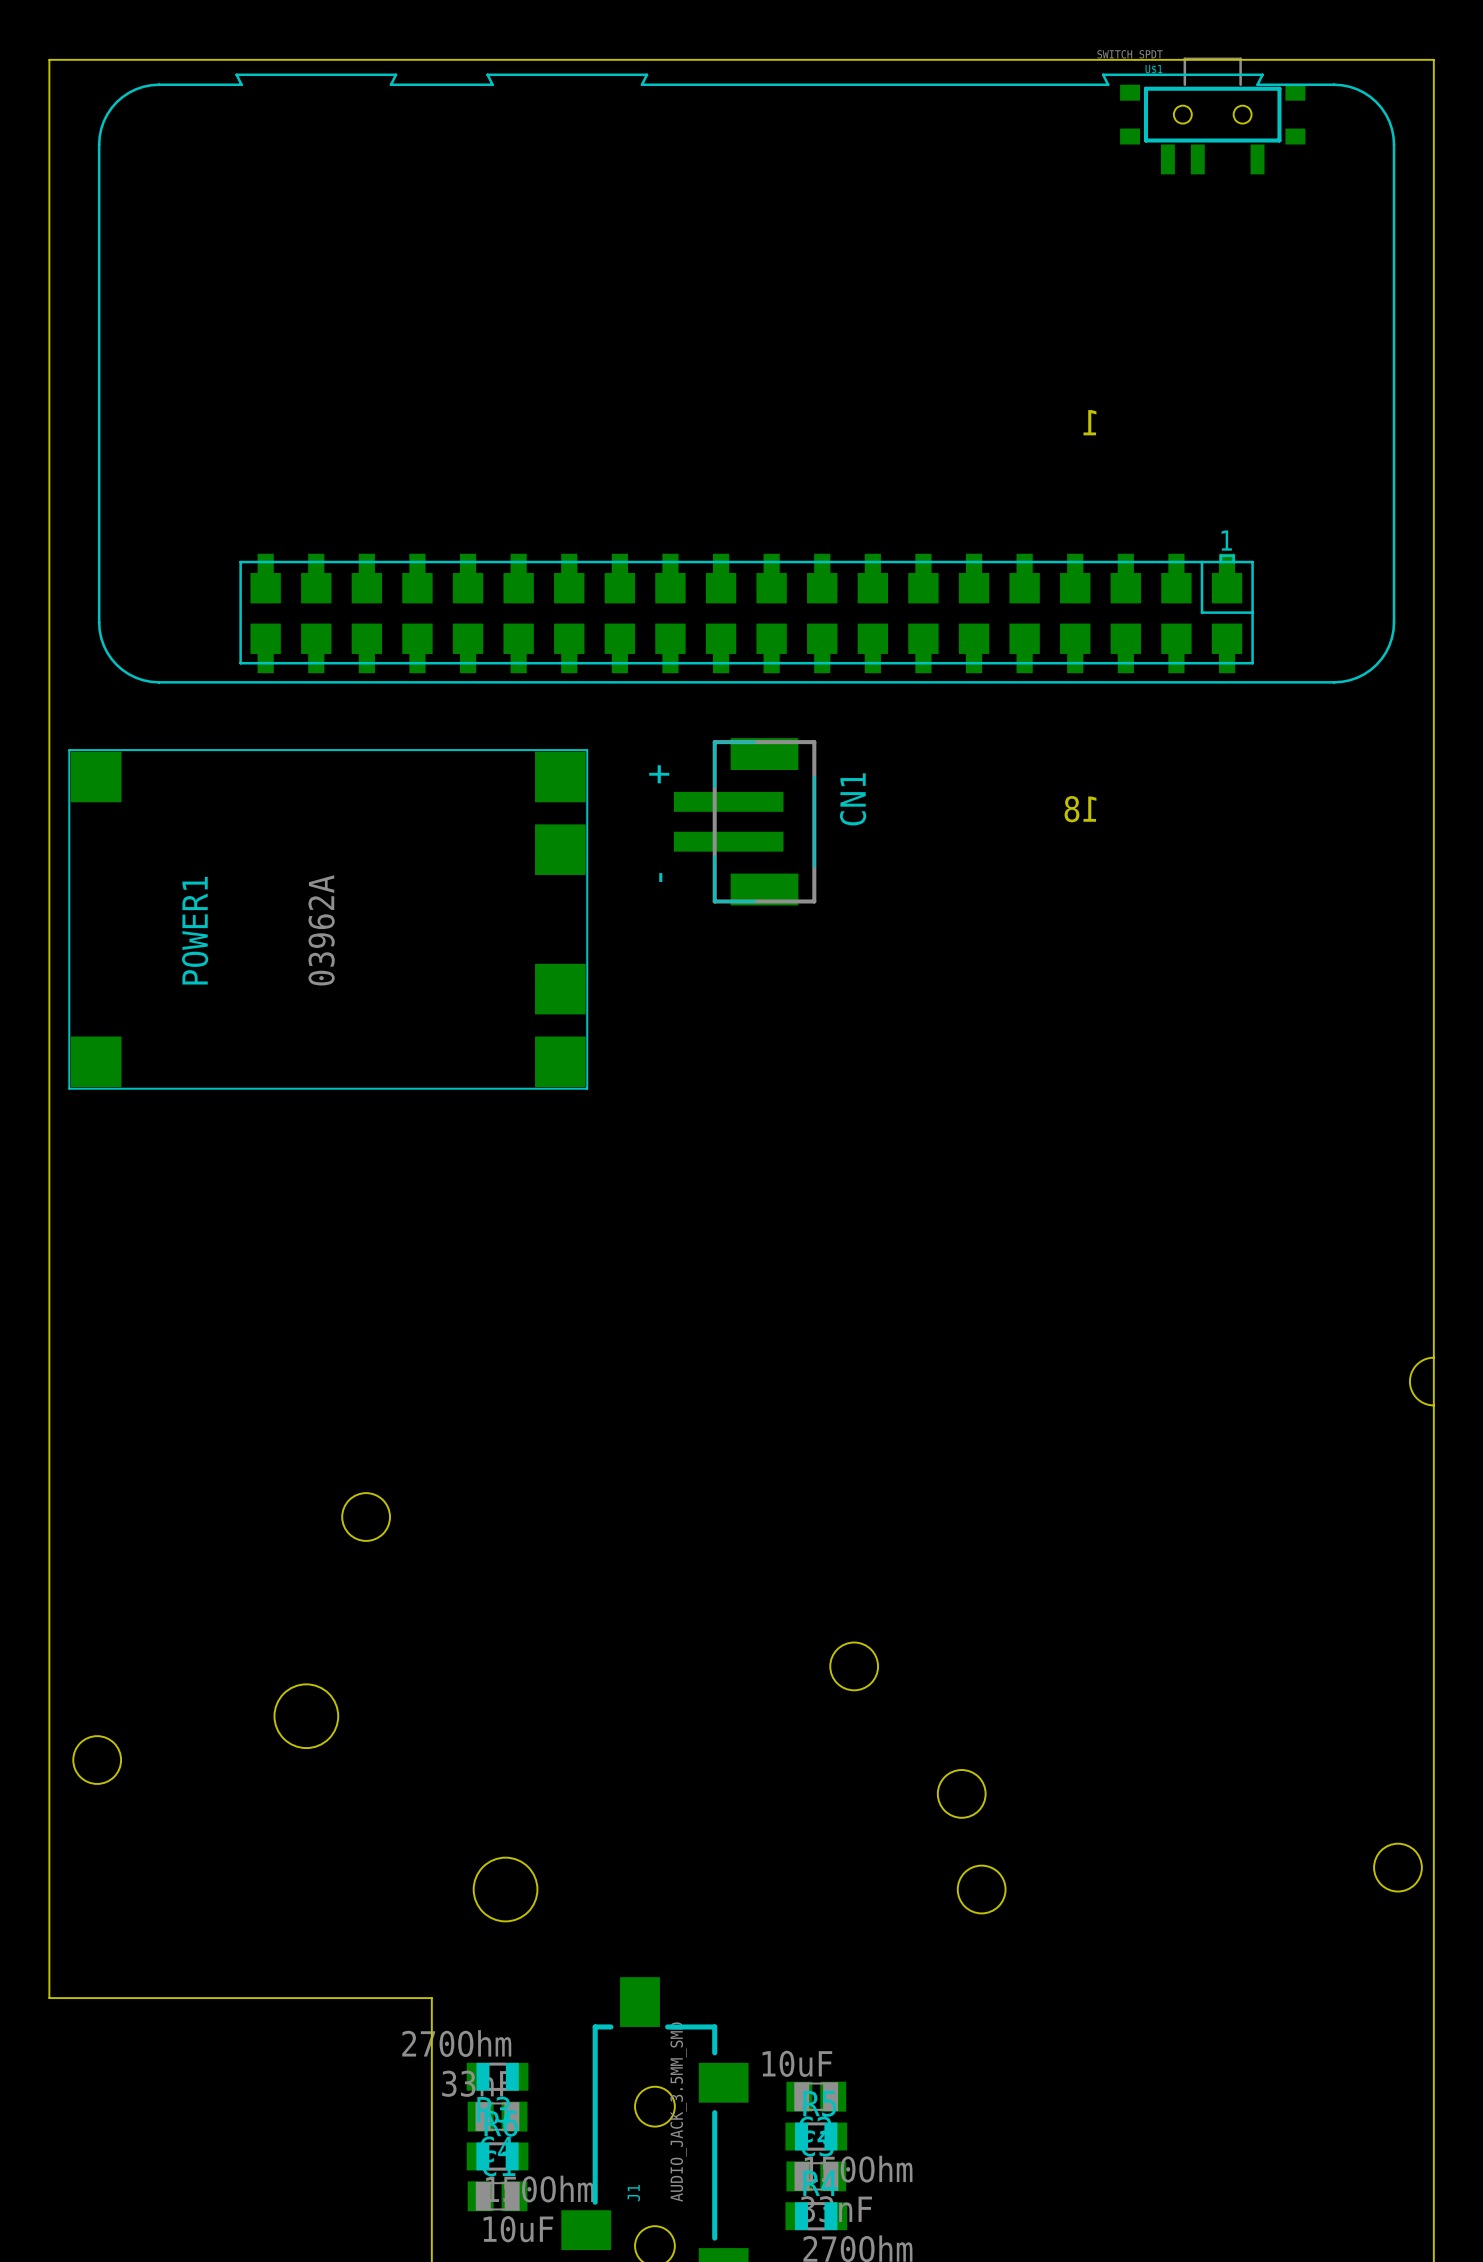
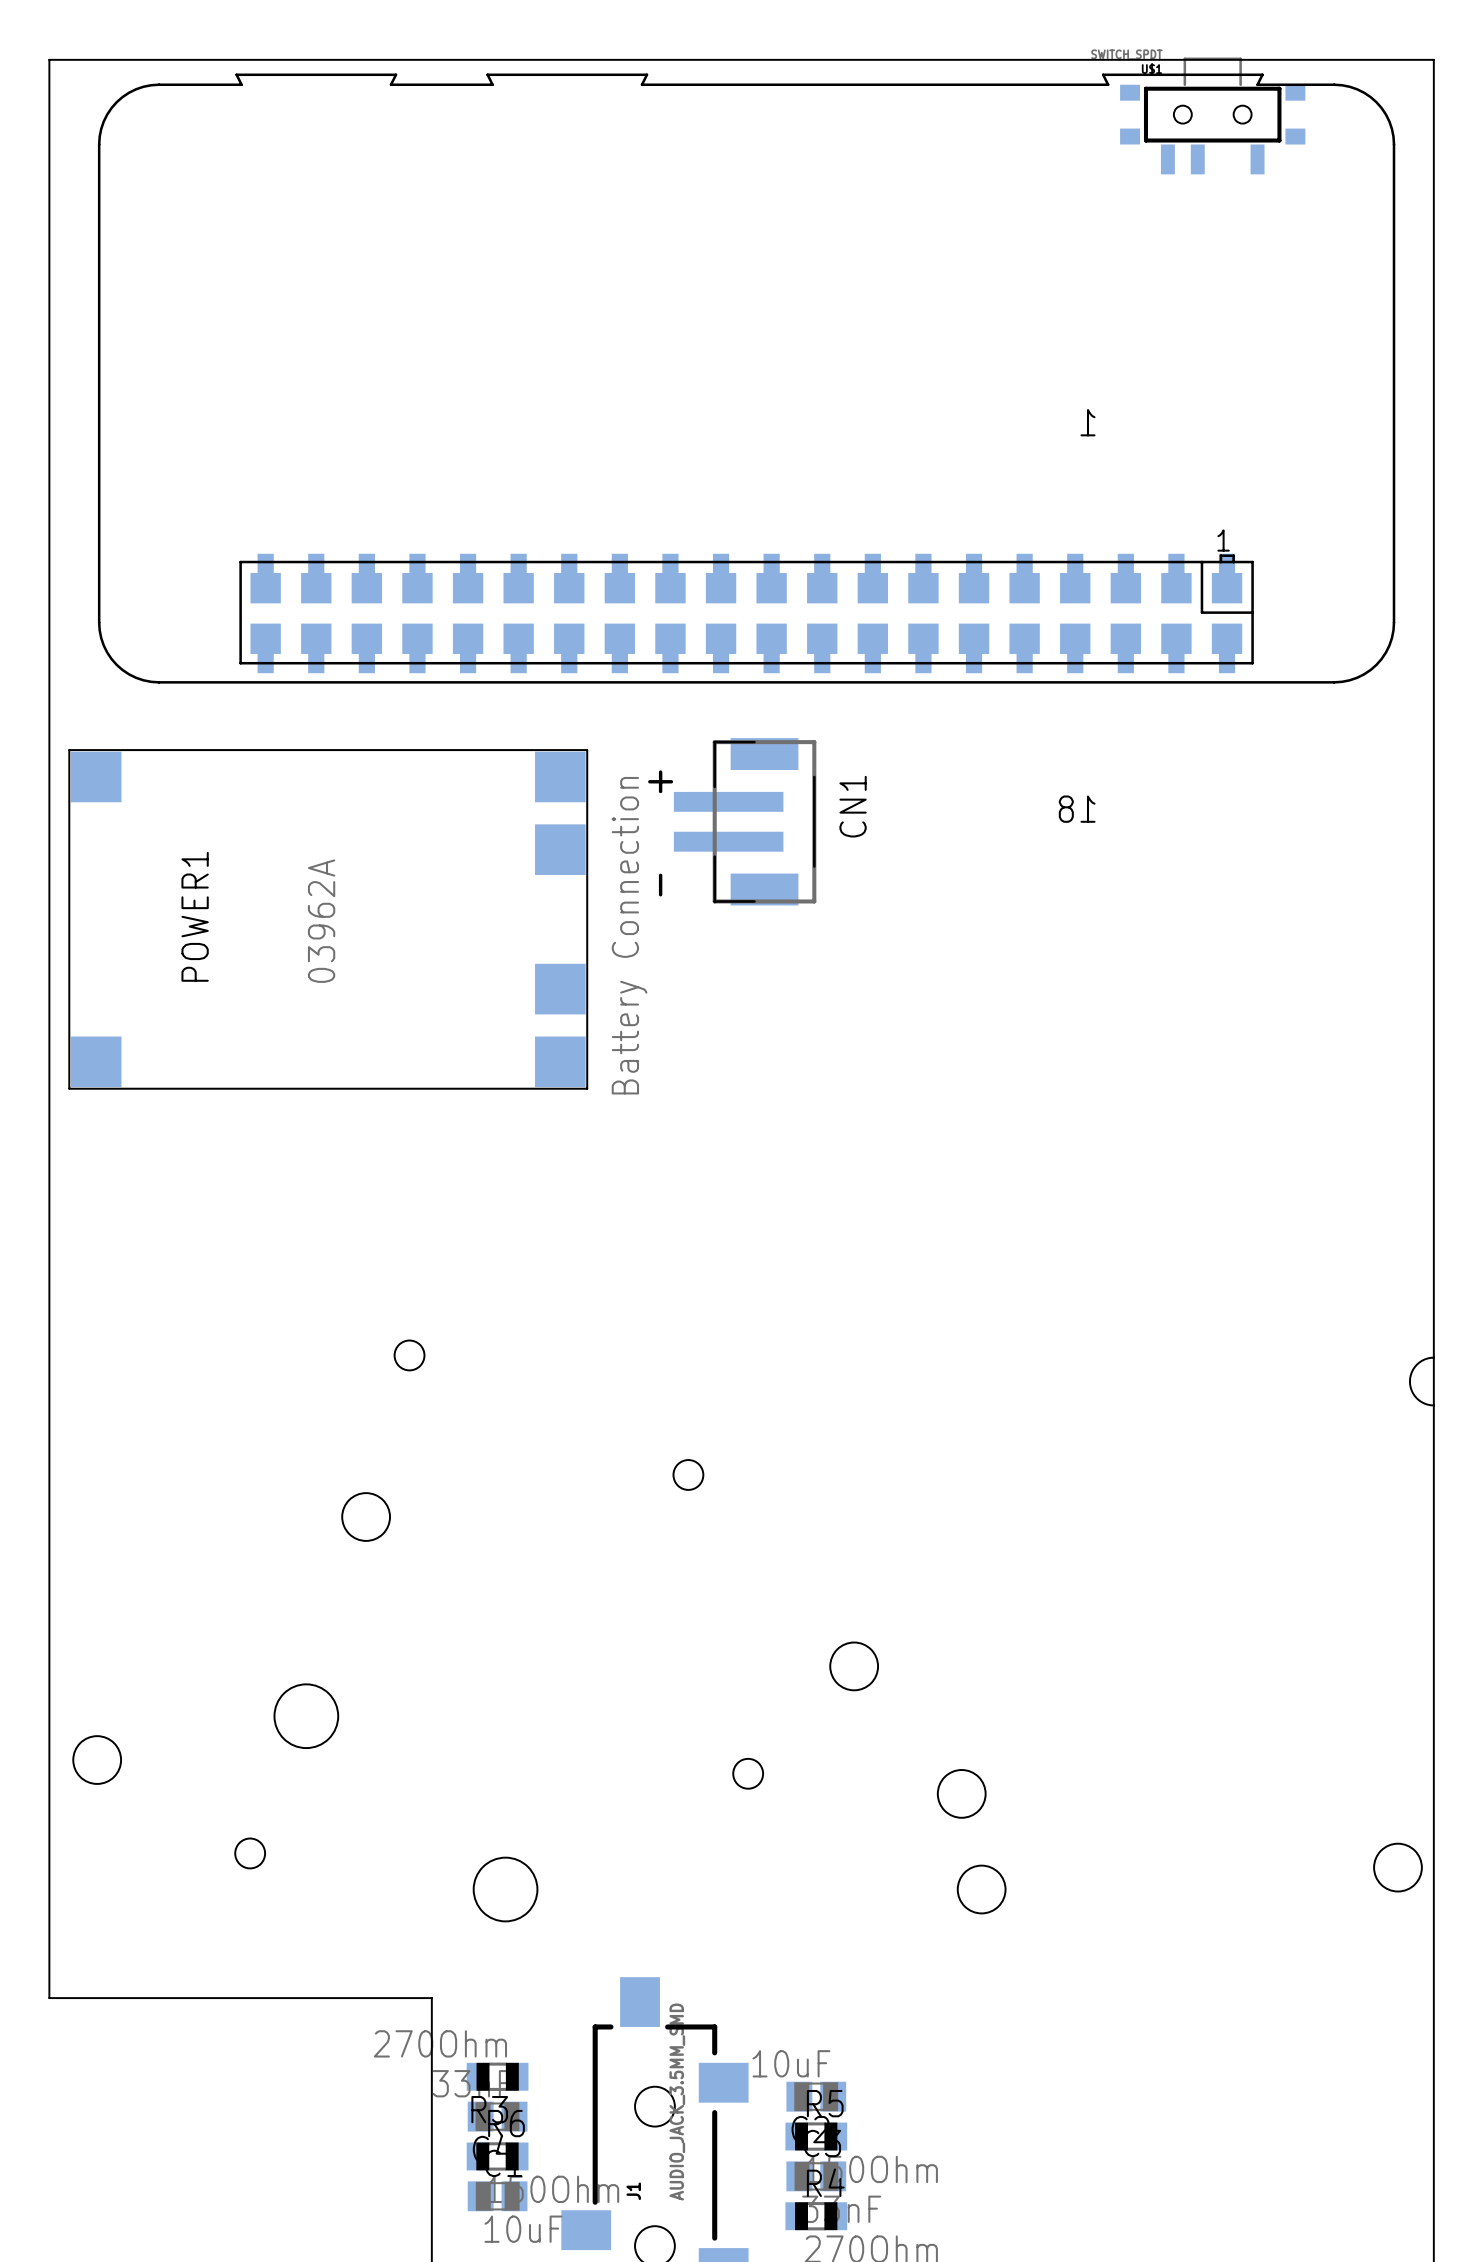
CN1 value: none -> Battery Connection (629, 935)
round board edge: none -> [394, 1340, 425, 1371]
round board edge: none -> [673, 1459, 704, 1491]
round board edge: none -> [733, 1758, 764, 1789]
round board edge: none -> [235, 1838, 266, 1869]

